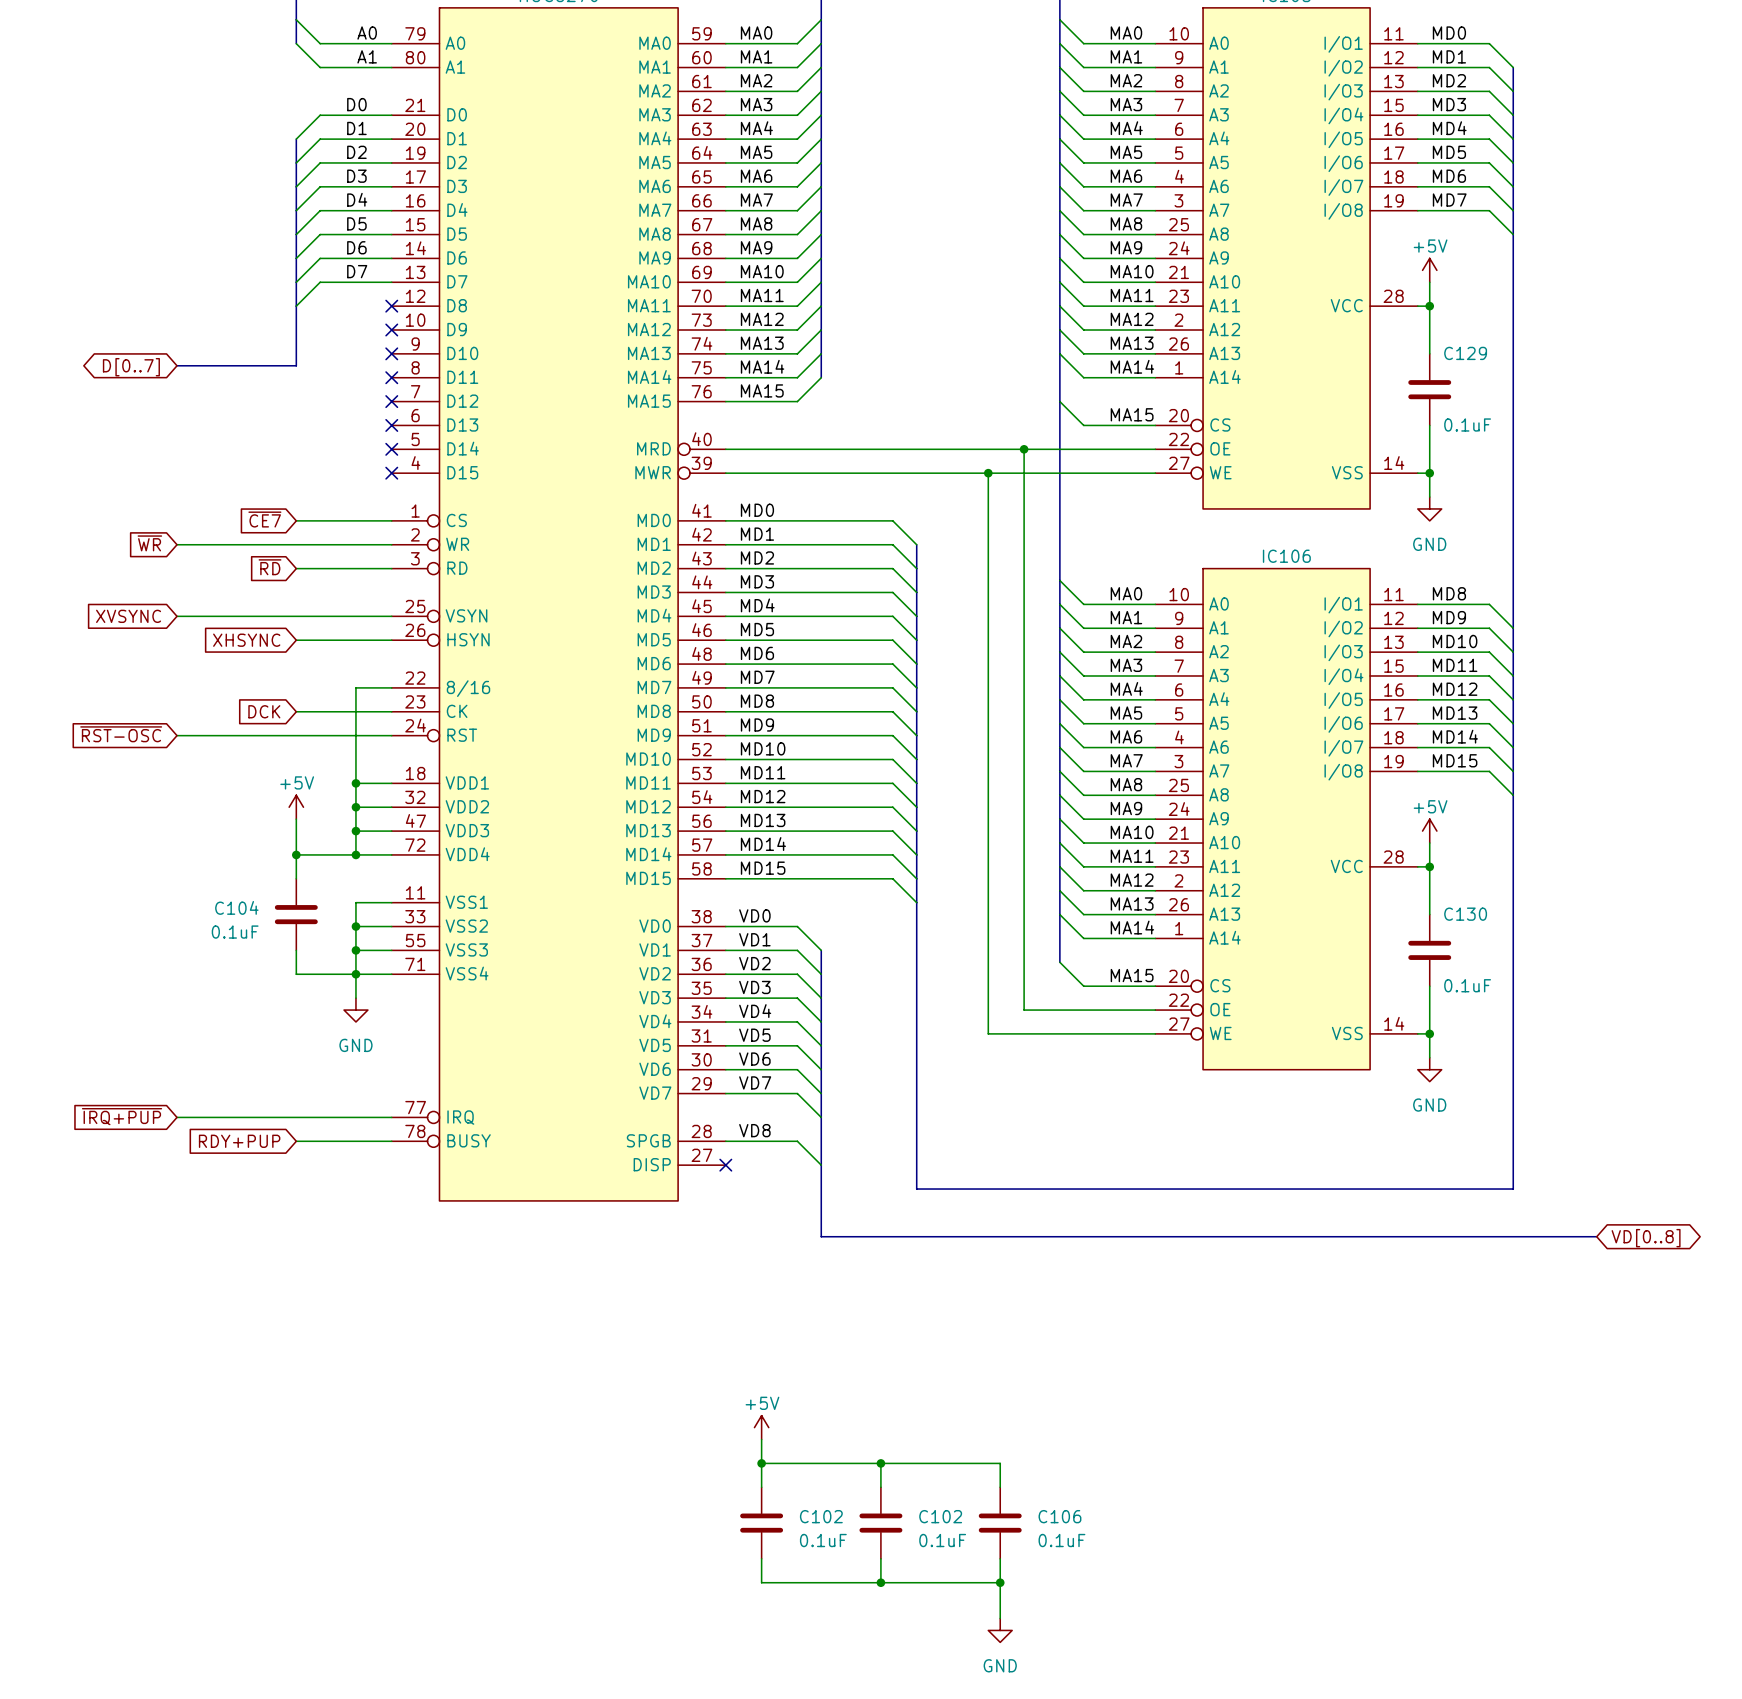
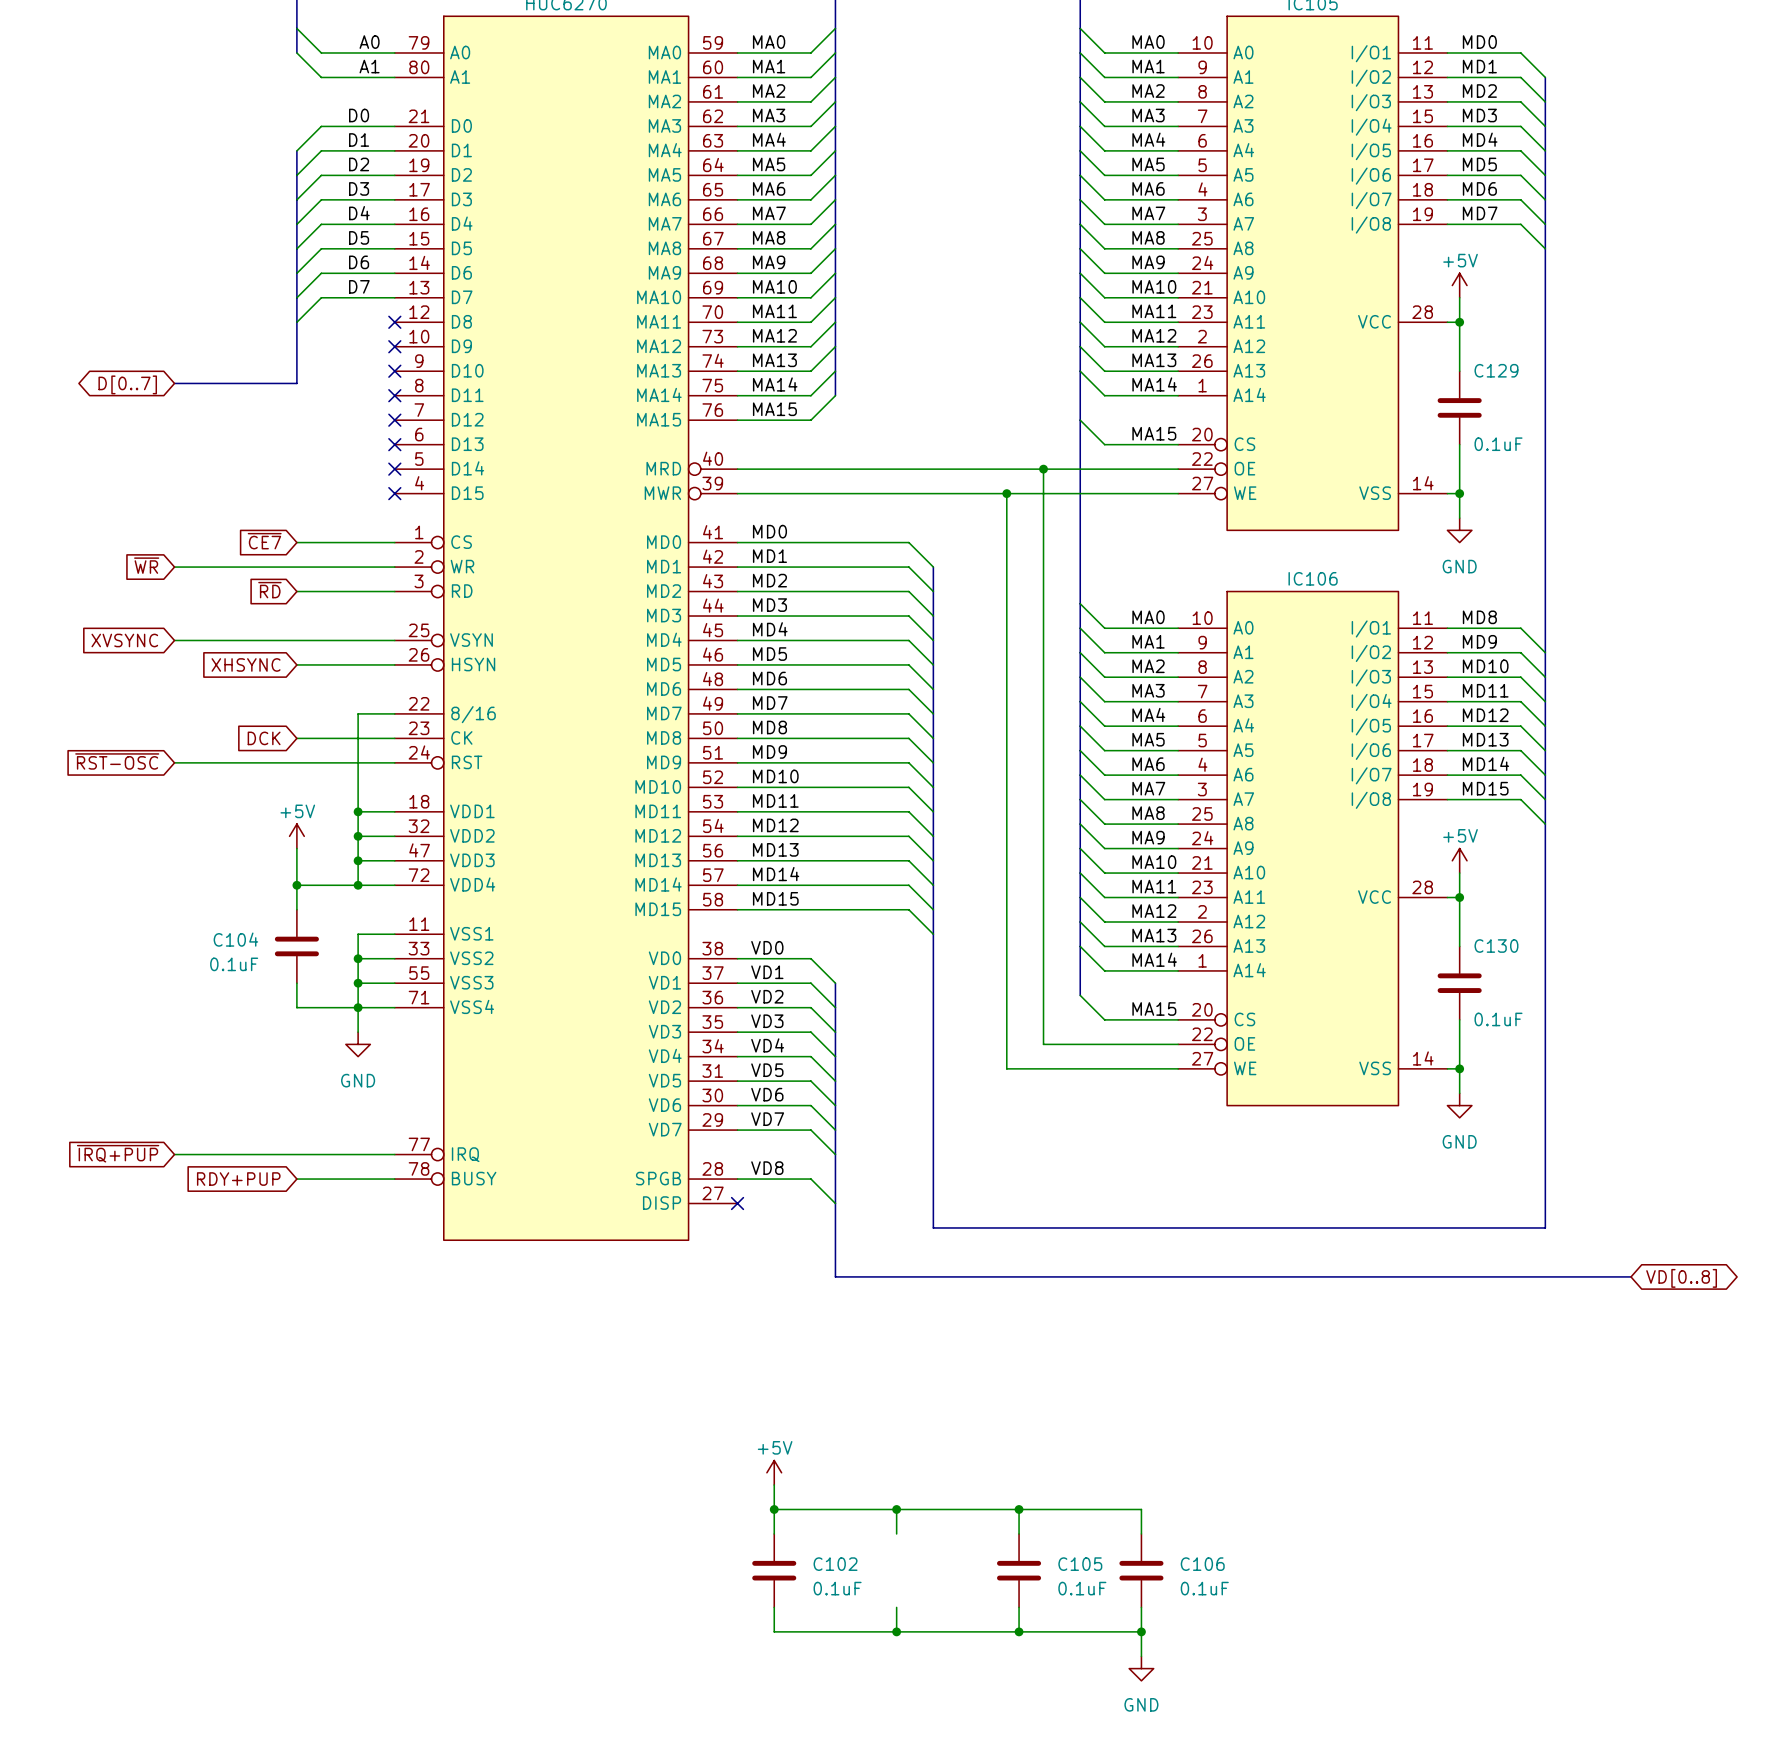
wire: none -> (1019, 1509) (1141, 1509) (1141, 1533)
junction: none -> (1019, 1509)
C106 name: C106 (1059, 1516) -> C105 (1080, 1564)
C102: 0.1uF (880, 1523) -> none
C106: none -> 0.1uF (1141, 1570)
wire: none -> (1141, 1607) (1141, 1656)
wire: (1000, 1582) (1000, 1618) -> (1019, 1631) (1141, 1631)
junction: none -> (1141, 1631)
power symbol position: GND (1000, 1630) -> GND (1141, 1668)

